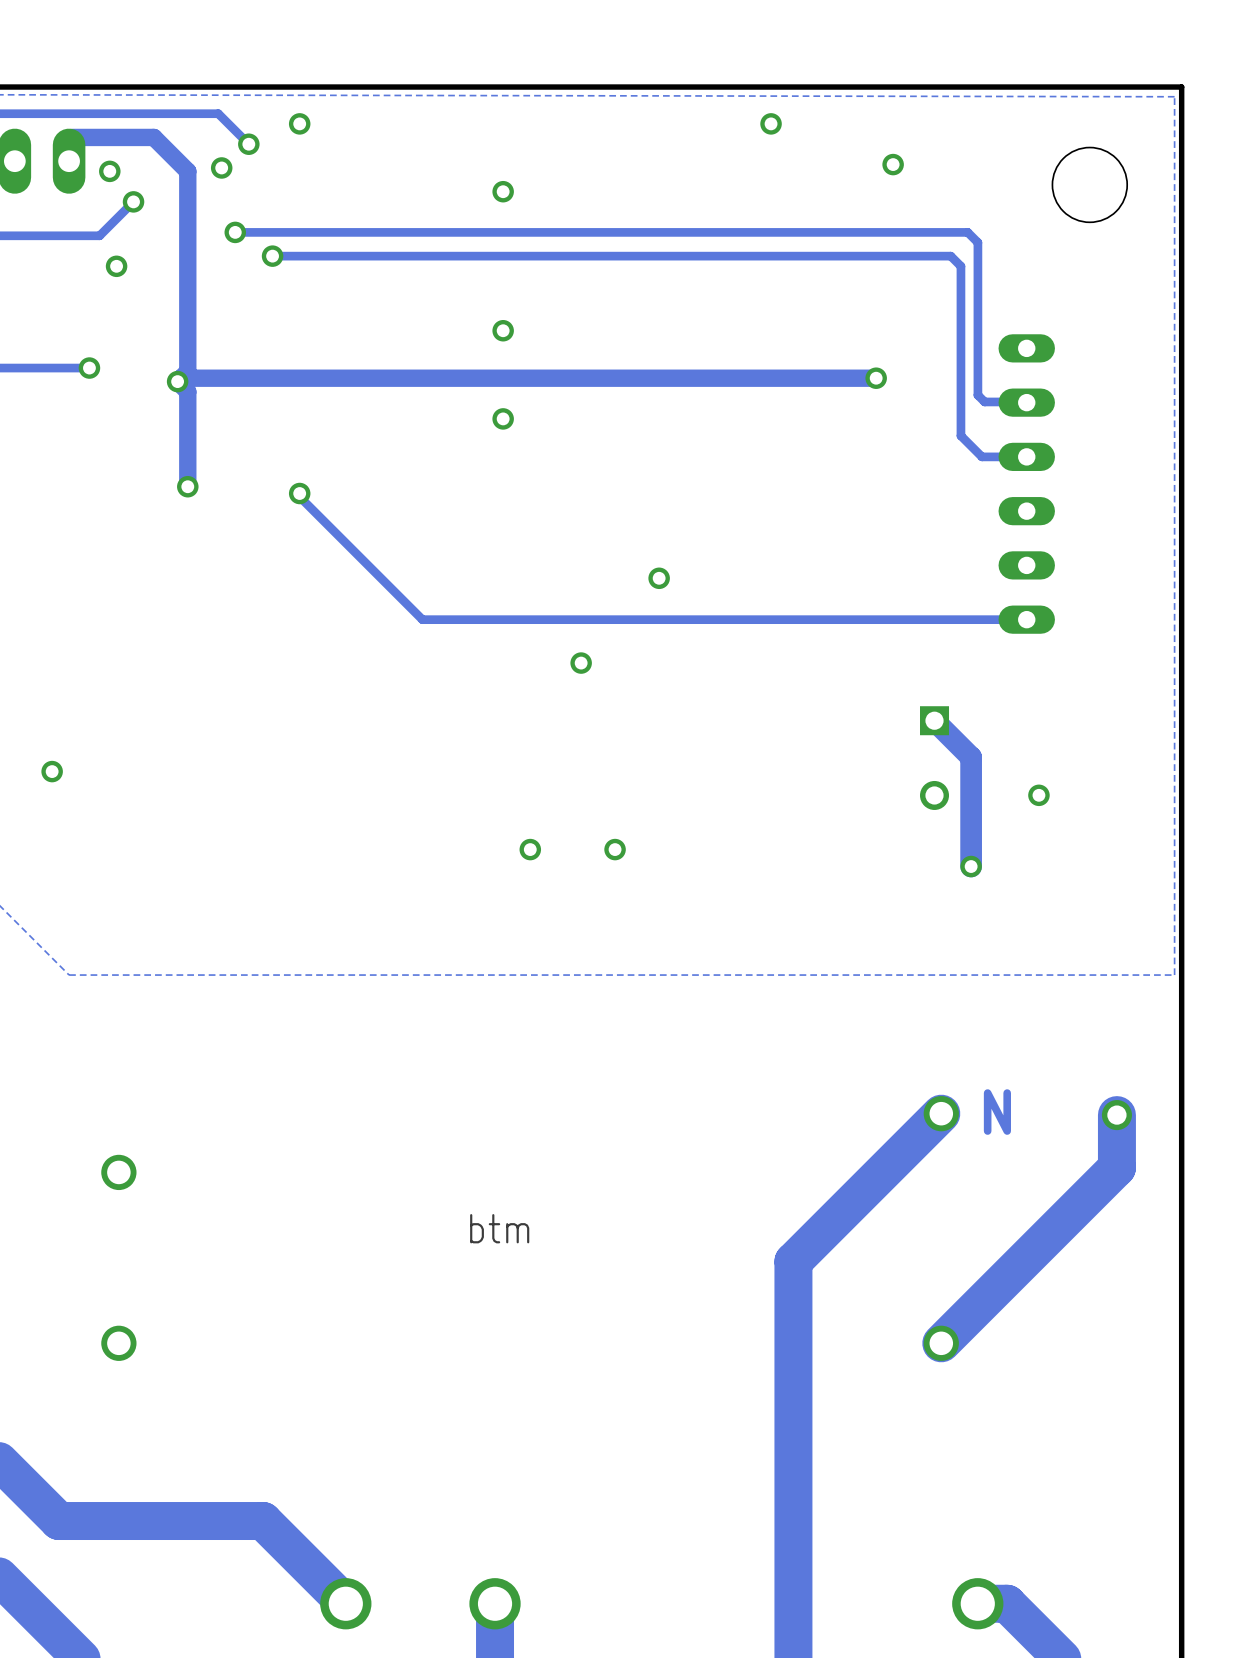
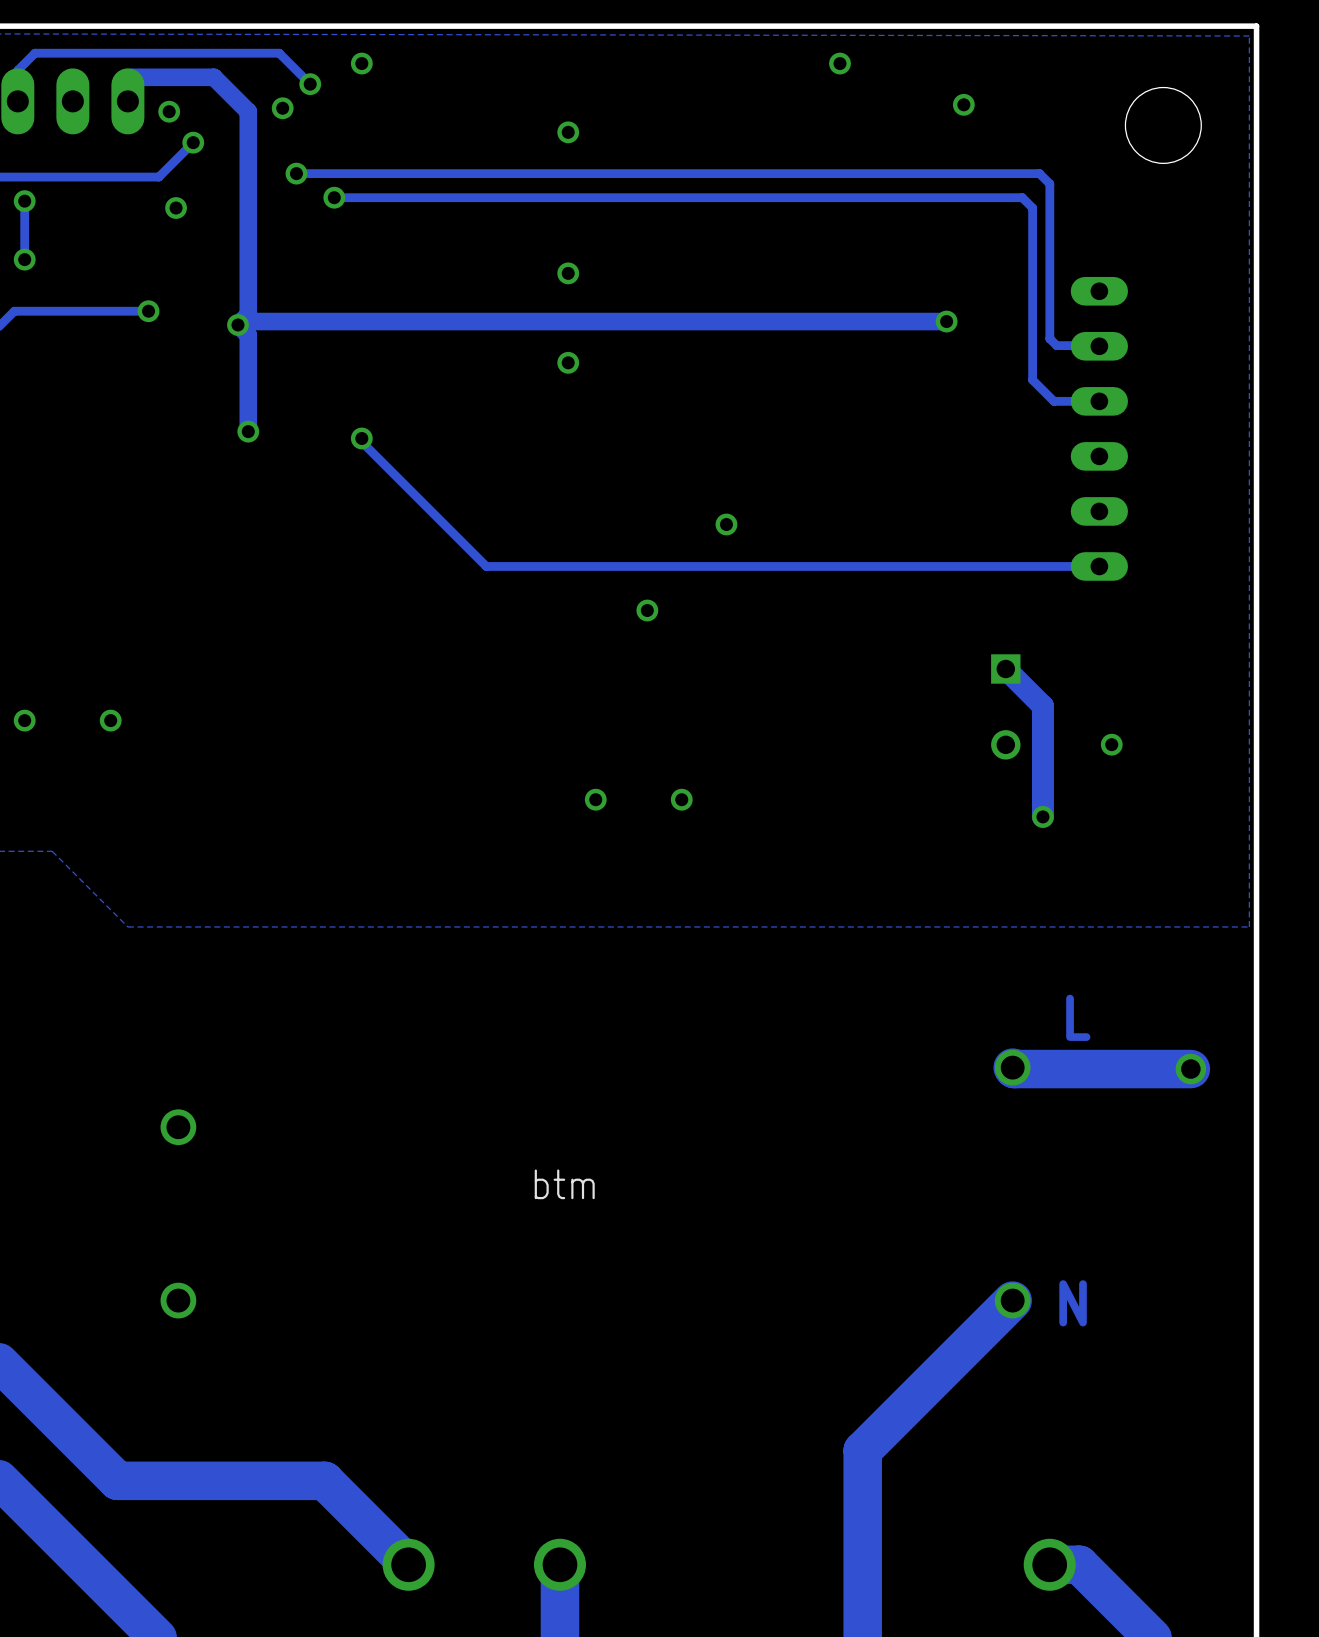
text: none -> L (1078, 1017)
text position: N (997, 1112) -> N (1073, 1303)
track: (941, 1113) (793, 1261) (793, 1491) -> (1012, 1300) (862, 1450)
track: (1116, 1115) (1116, 1167) (941, 1343) -> (1190, 1069) (1012, 1067)

